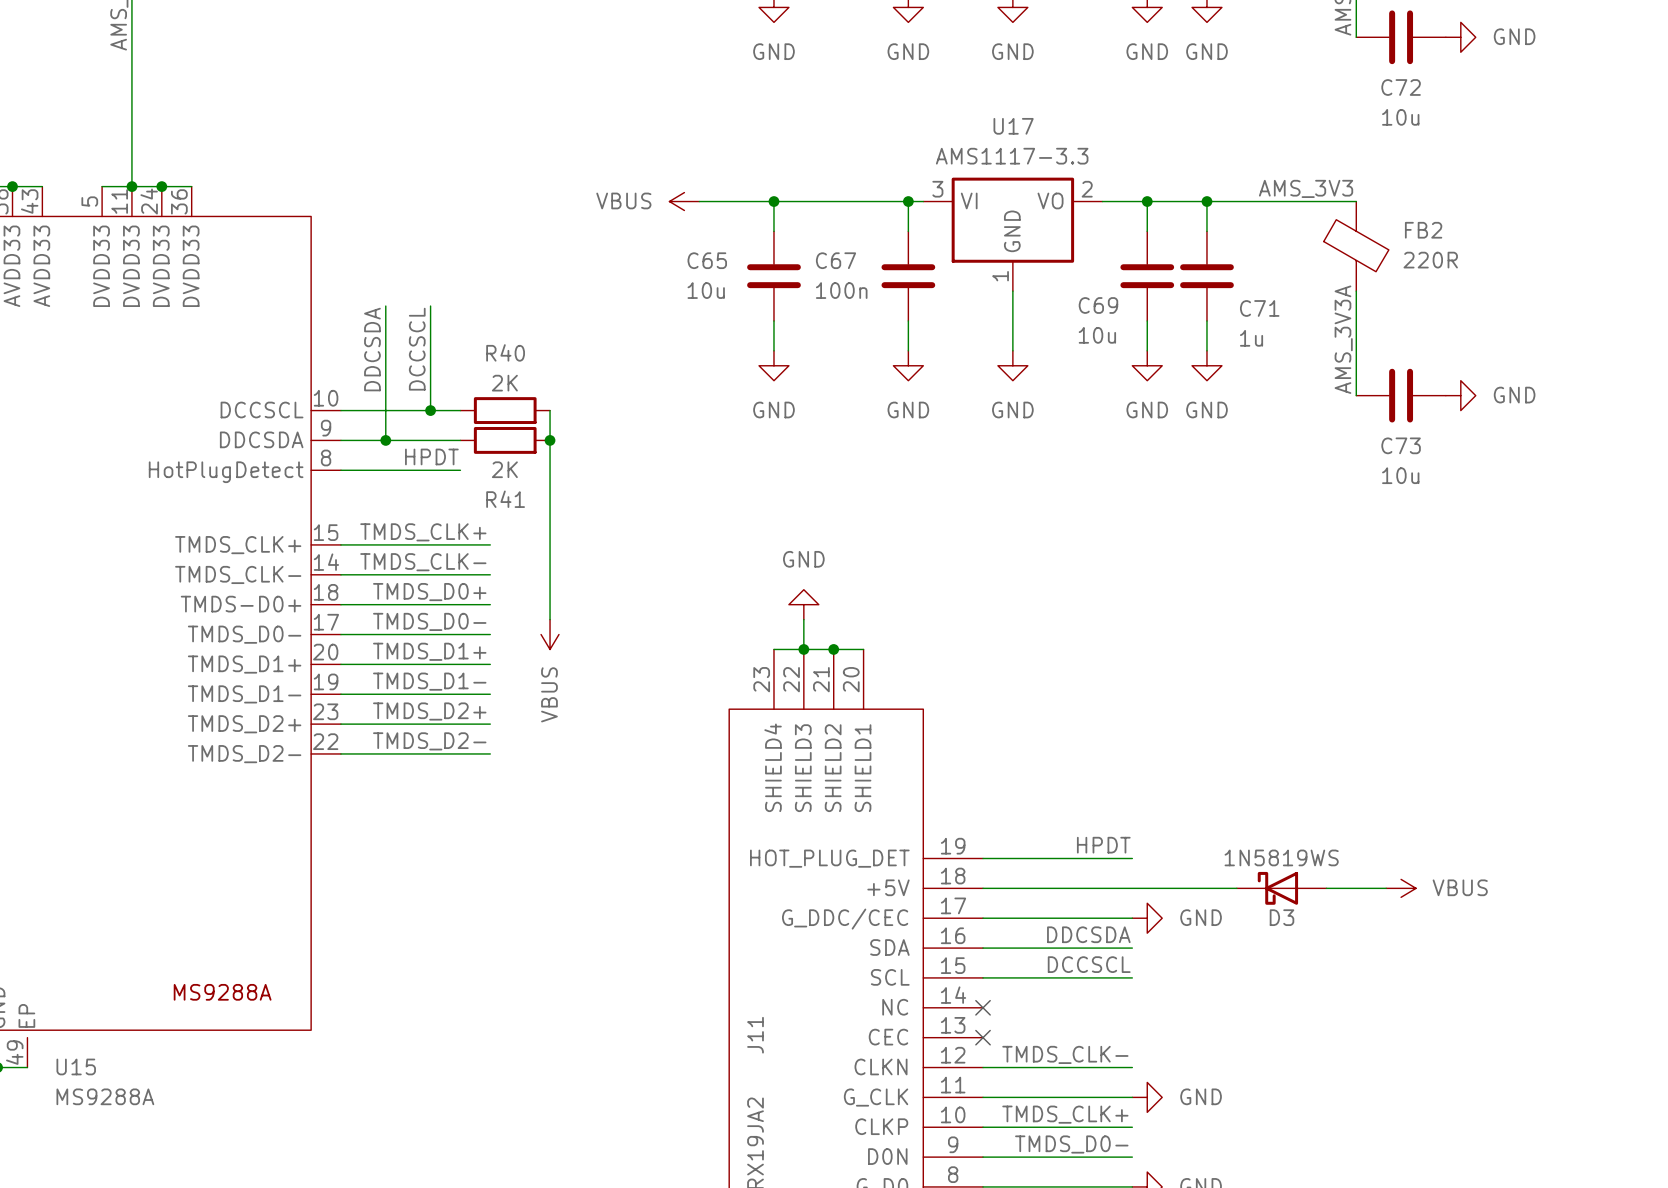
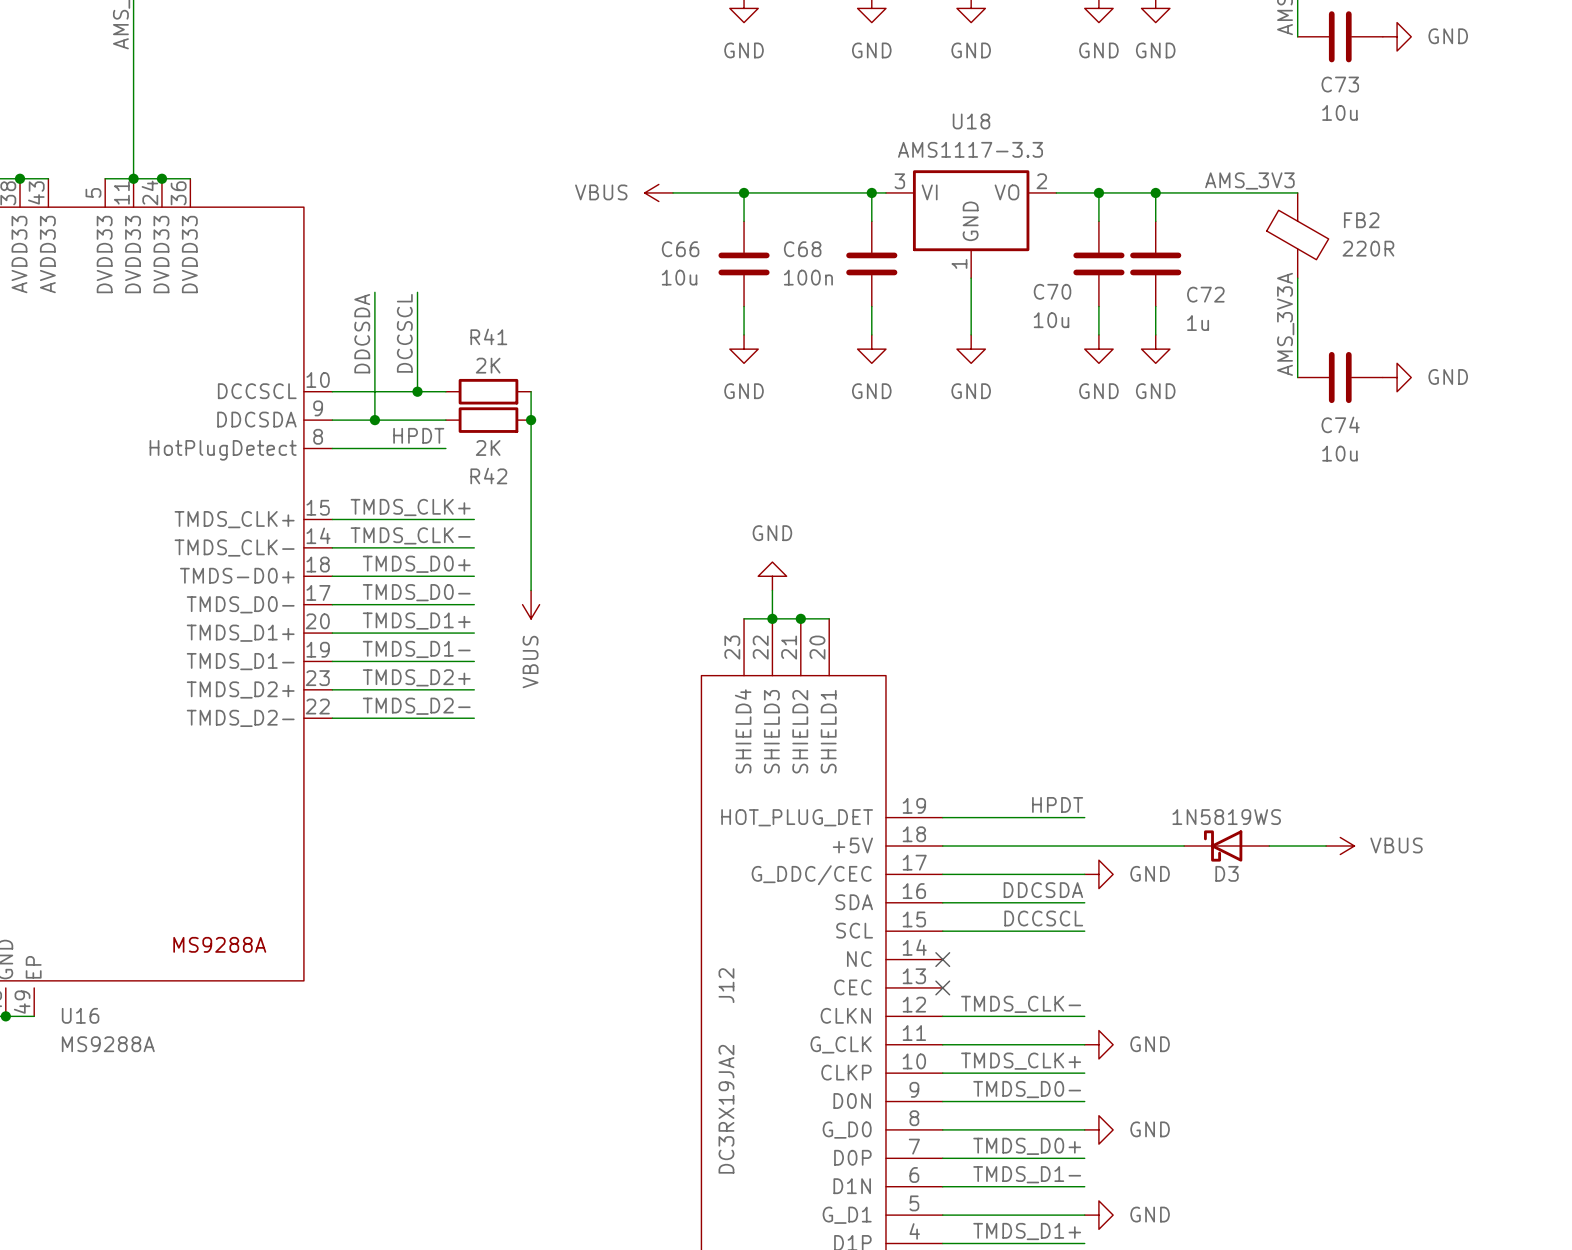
C72 name: C72 (1401, 87) -> C73 (1340, 84)
U17 name: U17 (1013, 126) -> U18 (971, 121)
C65 name: C65 (707, 260) -> C66 (680, 249)
C67 name: C67 (836, 260) -> C68 (802, 249)
C69 name: C69 (1098, 305) -> C70 (1052, 291)
C71 name: C71 (1259, 308) -> C72 (1205, 294)
R40 name: R40 (505, 352) -> R41 (488, 336)
C73 name: C73 (1401, 445) -> C74 (1340, 424)
R41 name: R41 (505, 499) -> R42 (488, 476)
J11 name: J11 (755, 1035) -> J12 (726, 985)
U15 name: U15 (76, 1066) -> U16 (80, 1015)

